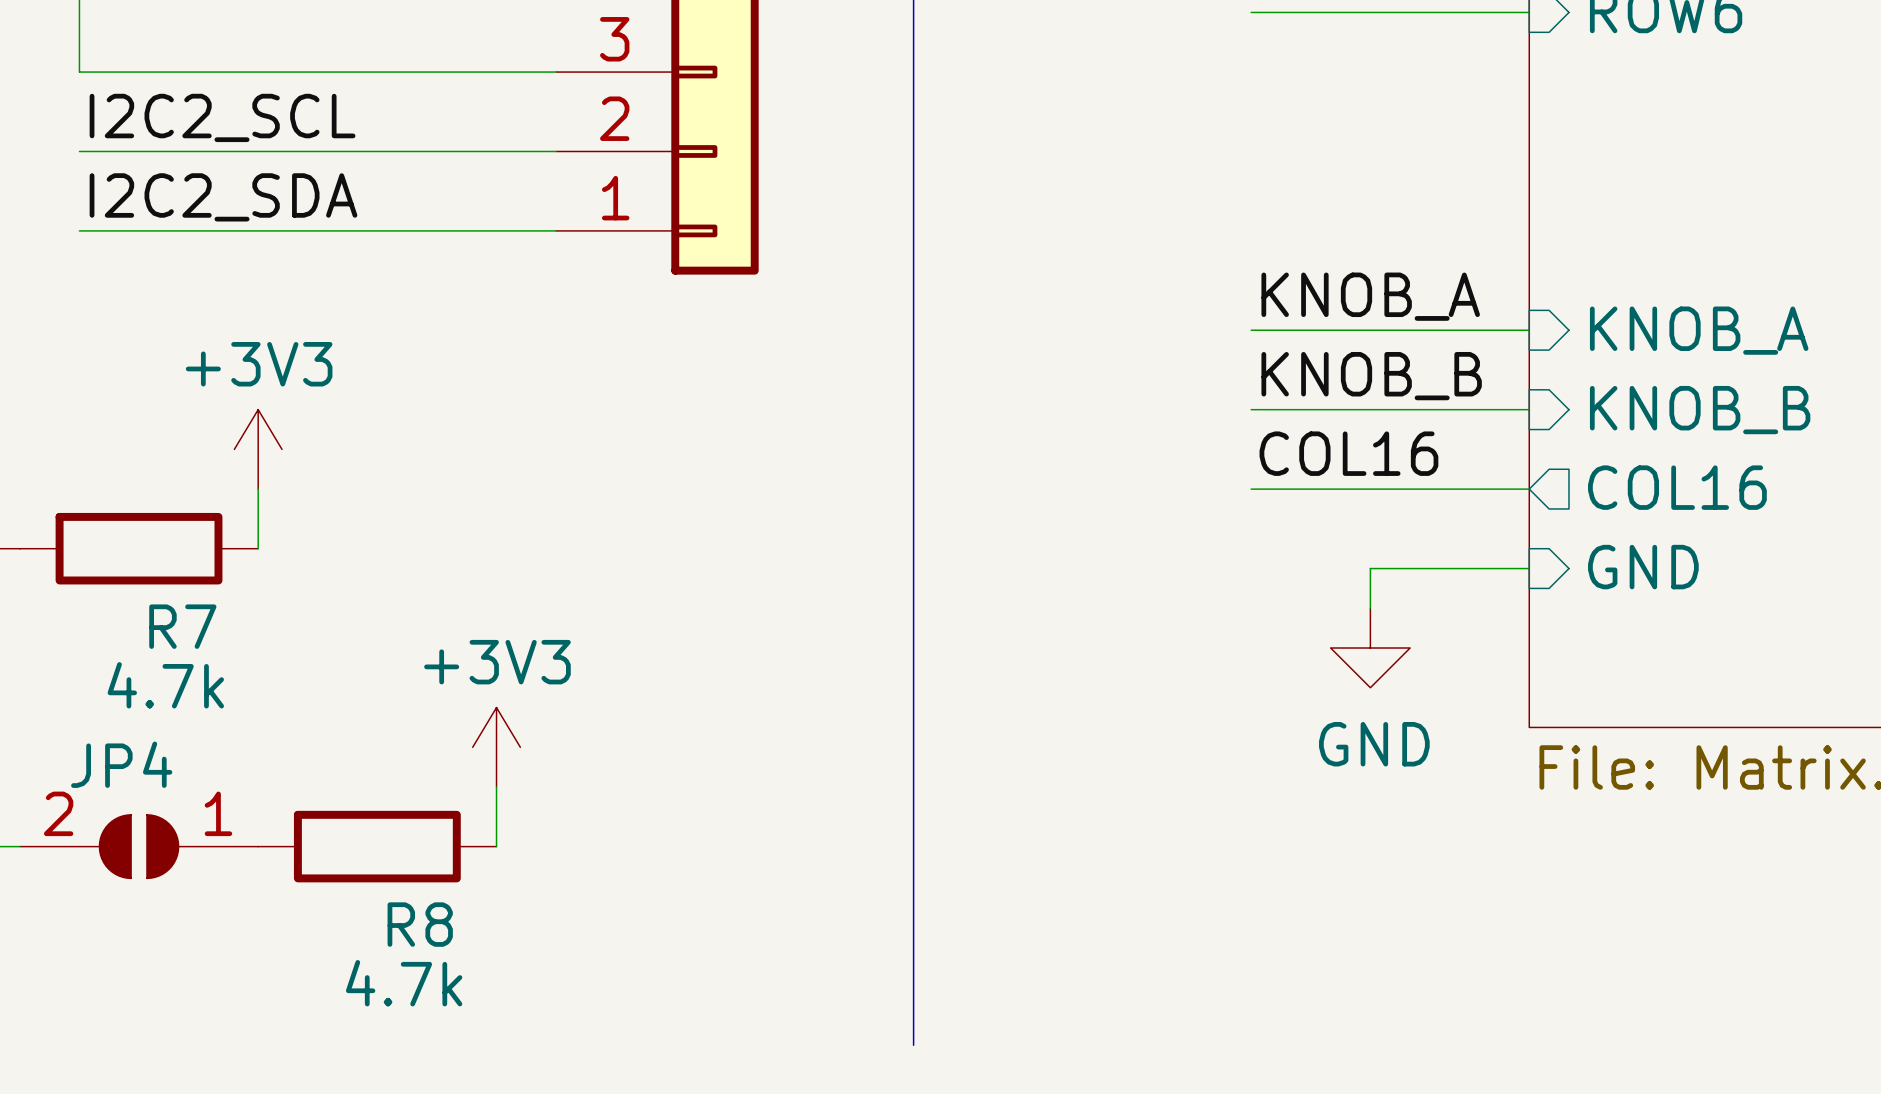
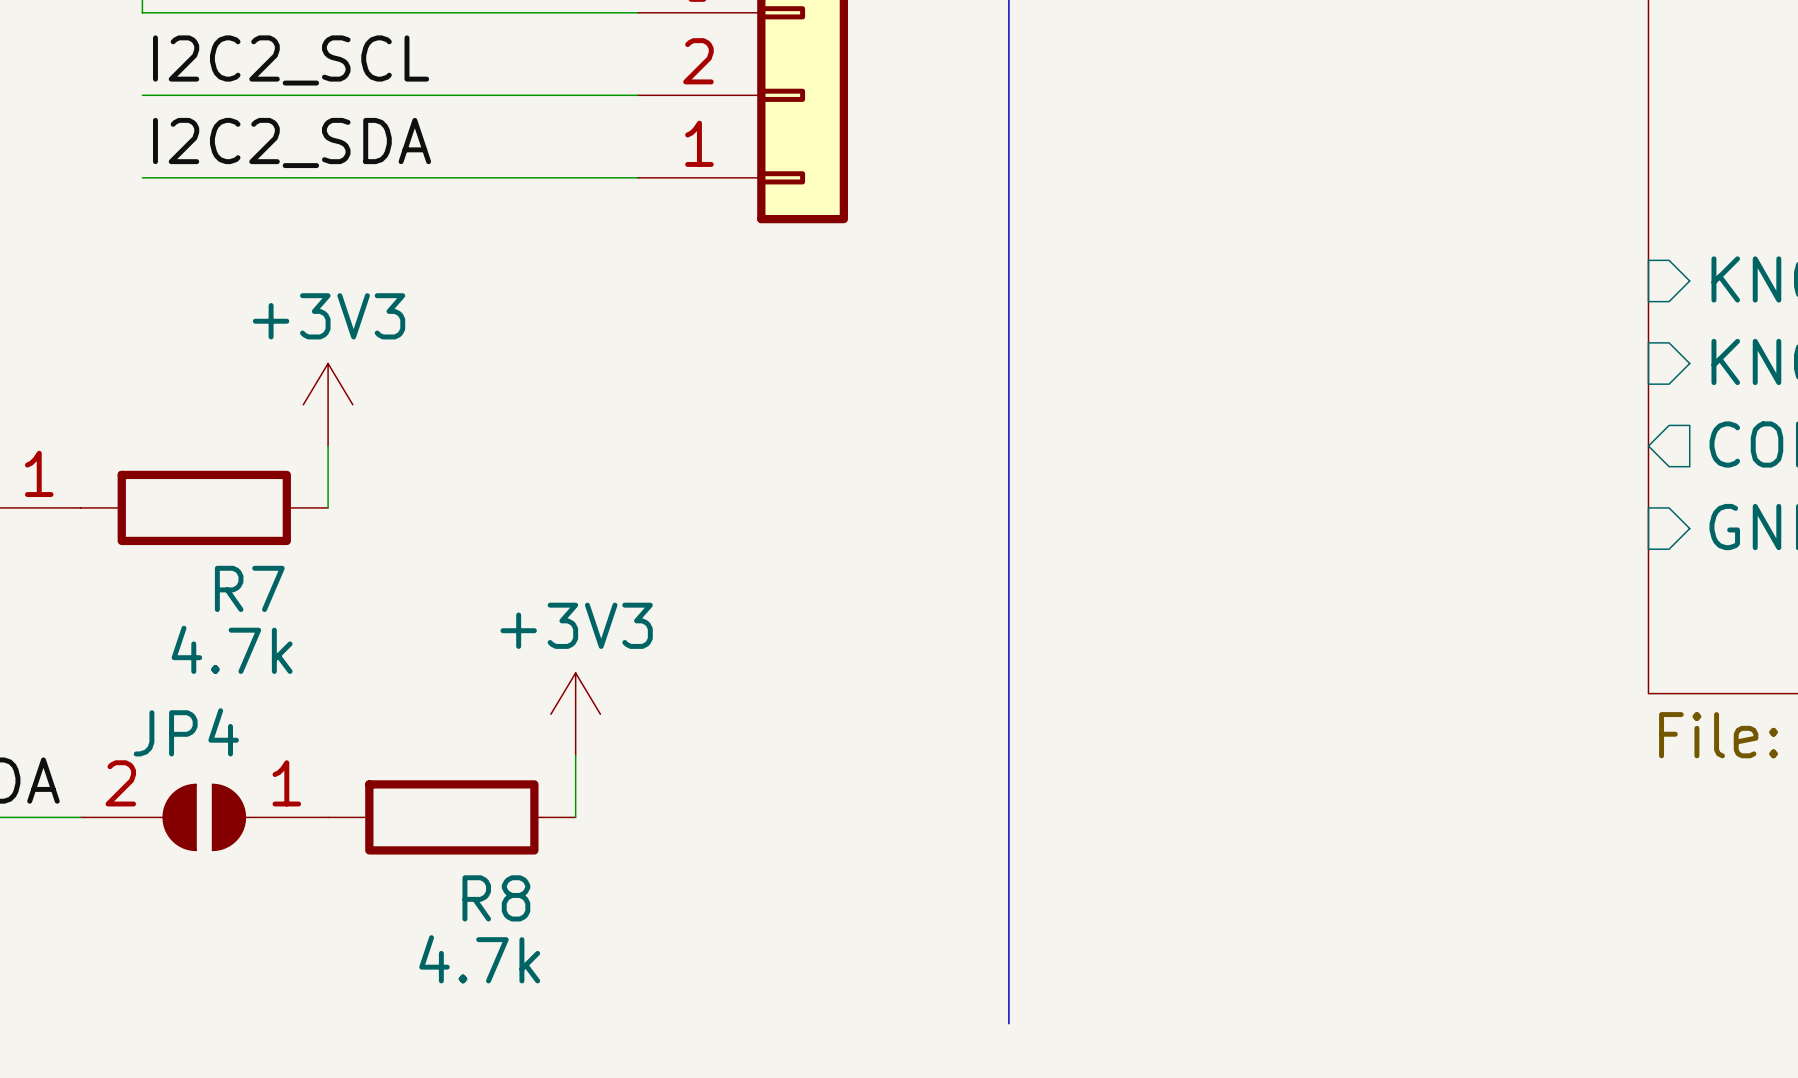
label: KNOB_A (1370, 296) -> none
wire: (1251, 330) (1529, 330) -> none
label: KNOB_B (1371, 376) -> none
wire: (1251, 409) (1529, 409) -> none
label: COL16 (1348, 453) -> none
wire: (1251, 489) (1529, 489) -> none
wire: (1529, 568) (1370, 568) (1370, 608) -> none
power symbol: GND (1370, 648) -> none

